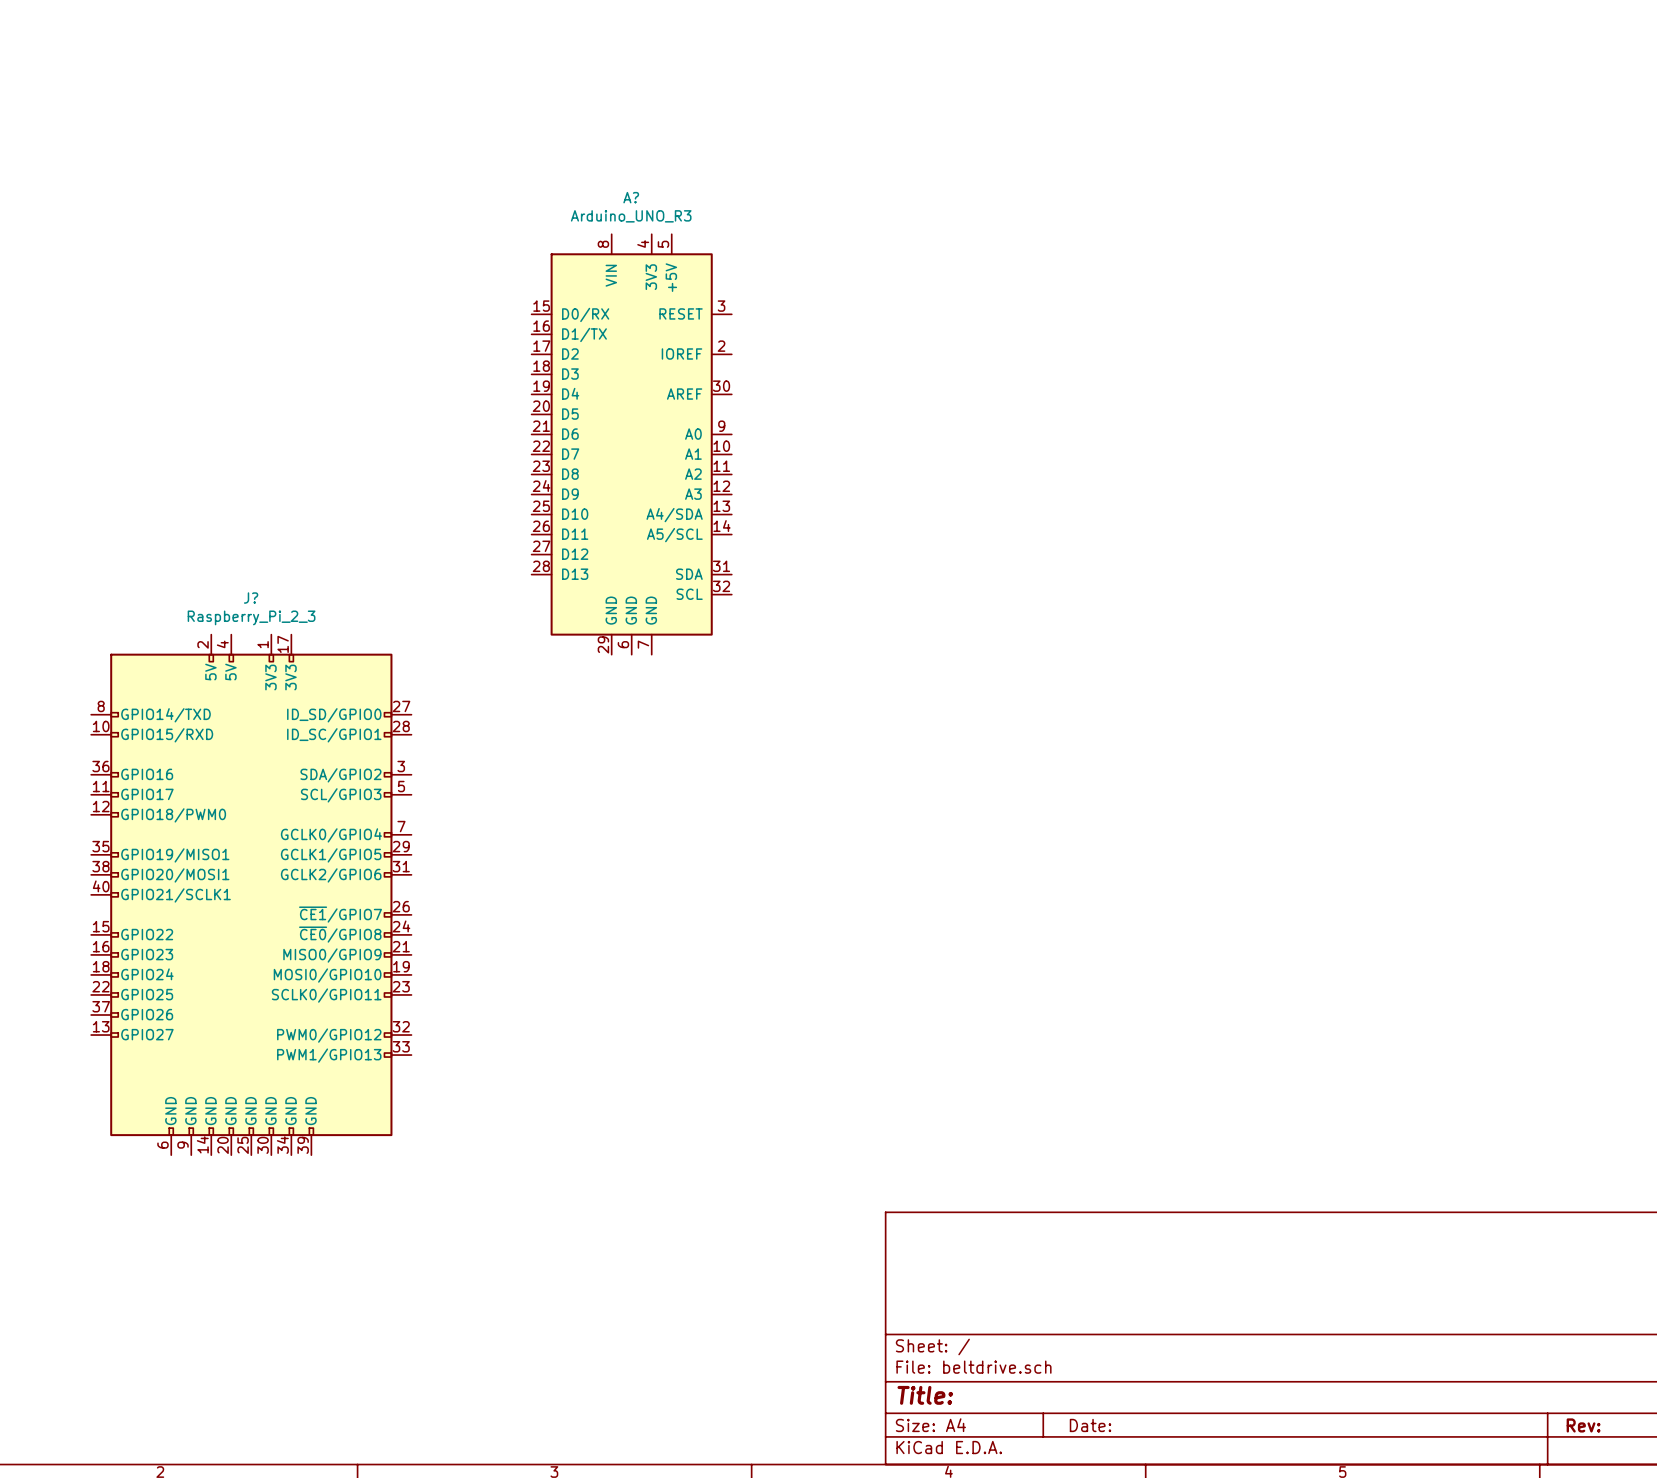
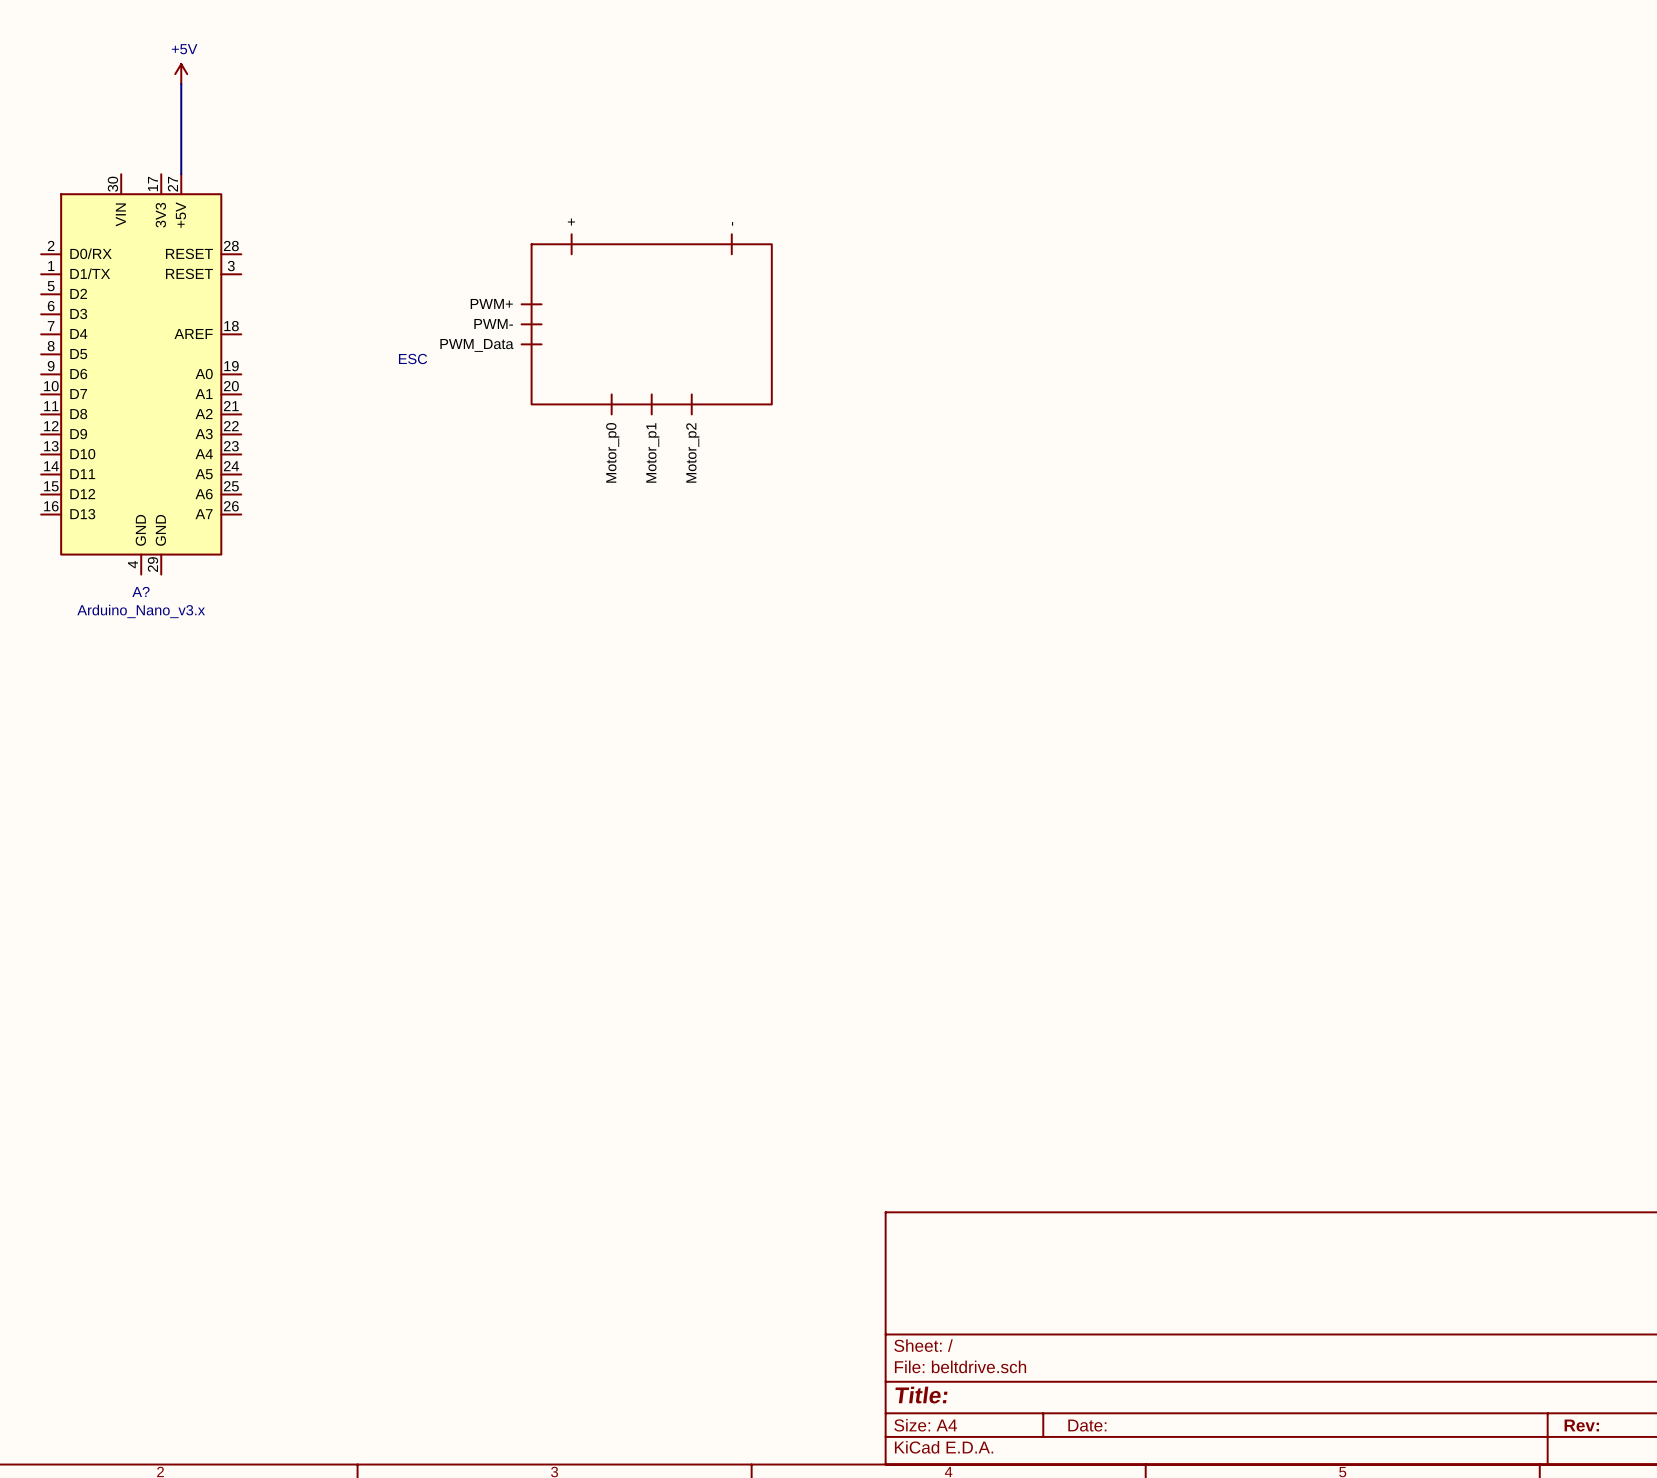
power symbol: none -> +5V (181, 74)
wire: none -> (181, 84) (181, 174)
part: none -> ESC (646, 324)
A?: none -> Arduino_Nano_v3.x (141, 374)
A?: Arduino_UNO_R3 (631, 444) -> none
J?: Raspberry_Pi_2_3 (251, 894) -> none

